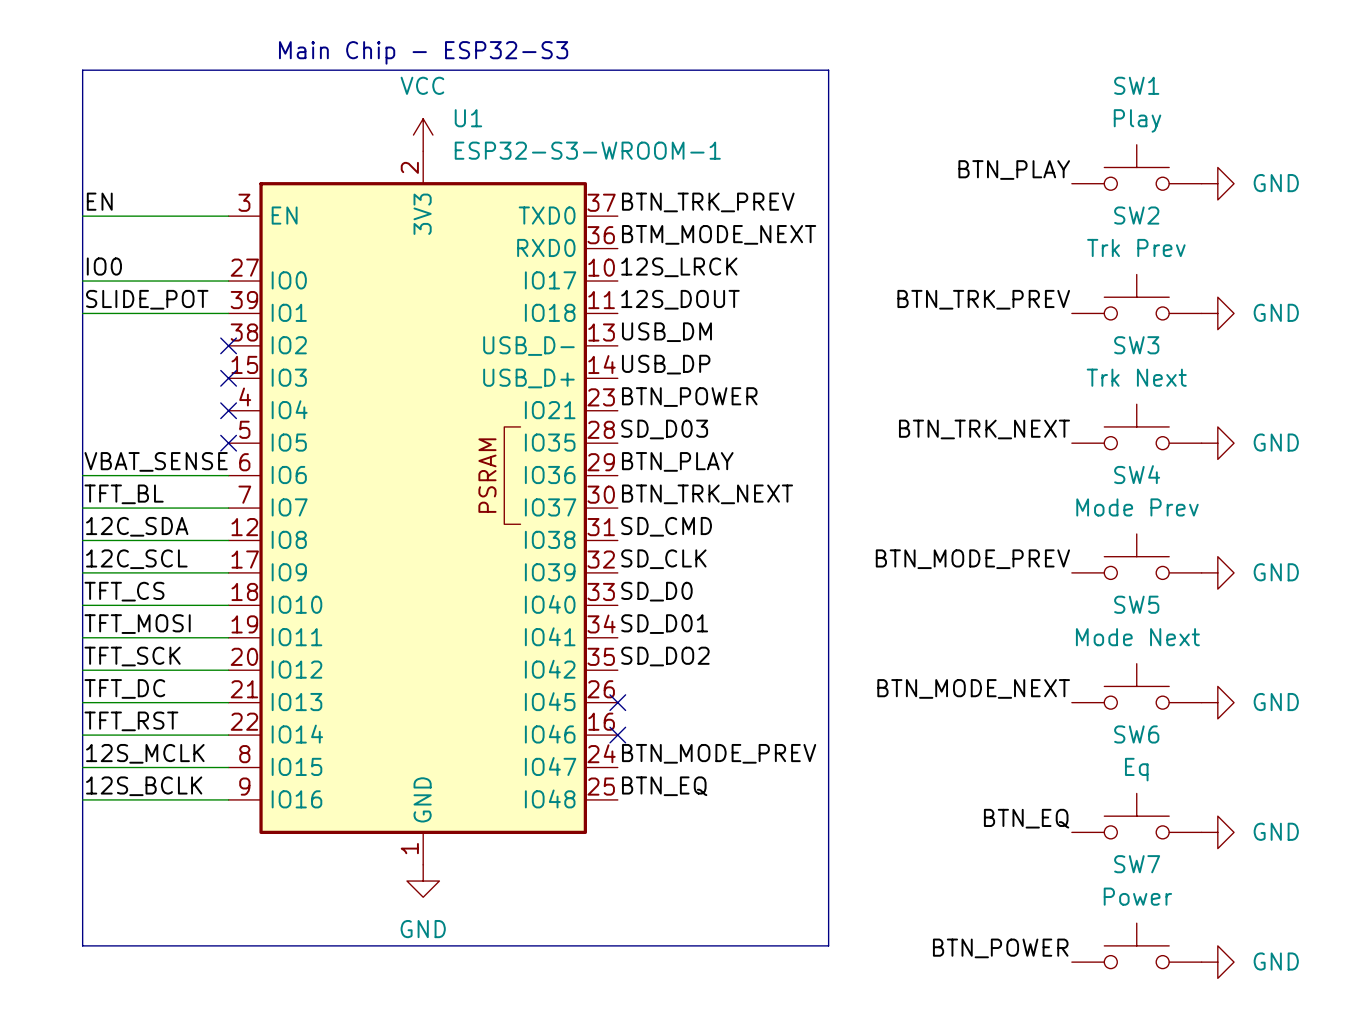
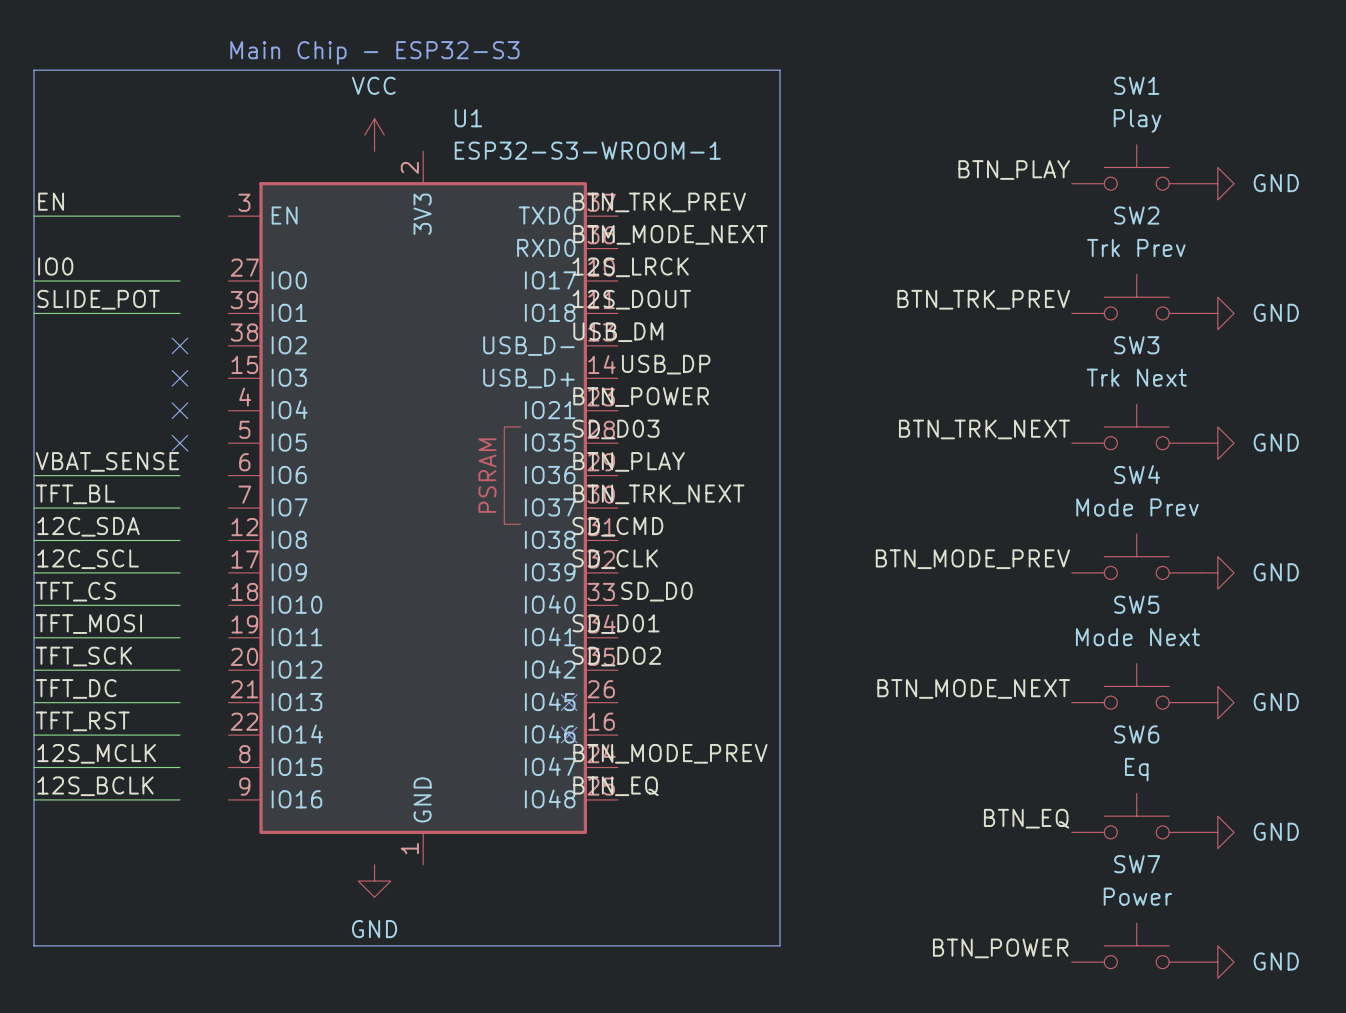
text position: Main Chip - ESP32-S3 (423, 52) -> Main Chip - ESP32-S3 (374, 52)
line: (82, 70) (82, 945) -> (82, 70) (33, 70) (33, 945) (82, 945)
line: (779, 70) (828, 70) (828, 945) (779, 945) -> (779, 70) (779, 945)
power symbol position: VCC (423, 135) -> VCC (374, 135)
label position: EN (99, 201) -> EN (51, 201)
label position: BTN_TRK_PREV (708, 202) -> BTN_TRK_PREV (659, 202)
wire: (179, 216) (228, 216) -> (33, 216) (82, 216)
label position: BTM_MODE_NEXT (719, 234) -> BTM_MODE_NEXT (670, 234)
label position: IO0 (104, 266) -> IO0 (55, 266)
label position: 12S_LRCK (679, 267) -> 12S_LRCK (630, 267)
wire: (179, 281) (228, 281) -> (33, 281) (82, 281)
label position: SLIDE_POT (147, 299) -> SLIDE_POT (98, 299)
label position: 12S_DOUT (680, 299) -> 12S_DOUT (631, 299)
wire: (179, 313) (228, 313) -> (33, 313) (82, 313)
label position: USB_DM (666, 332) -> USB_DM (618, 332)
no-connect mark: none -> (179, 345)
no-connect mark: (228, 345) -> none
no-connect mark: none -> (179, 378)
no-connect mark: (228, 378) -> none
label position: BTN_POWER (689, 397) -> BTN_POWER (641, 397)
no-connect mark: none -> (179, 410)
no-connect mark: (228, 410) -> none
label position: SD_D03 (664, 429) -> SD_D03 (615, 429)
no-connect mark: none -> (179, 443)
no-connect mark: (228, 443) -> none
label position: VBAT_SENSE (156, 461) -> VBAT_SENSE (107, 461)
label position: BTN_PLAY (677, 461) -> BTN_PLAY (629, 461)
wire: (179, 475) (228, 475) -> (33, 475) (82, 475)
label position: TFT_BL (124, 494) -> TFT_BL (75, 494)
label position: BTN_TRK_NEXT (707, 494) -> BTN_TRK_NEXT (658, 494)
wire: (179, 508) (228, 508) -> (33, 508) (82, 508)
label position: 12C_SDA (137, 526) -> 12C_SDA (88, 526)
label position: SD_CMD (666, 526) -> SD_CMD (617, 526)
wire: (179, 540) (228, 540) -> (33, 540) (82, 540)
label position: 12C_SCL (136, 559) -> 12C_SCL (88, 559)
label position: SD_CLK (663, 559) -> SD_CLK (615, 559)
wire: (179, 572) (228, 572) -> (33, 572) (82, 572)
label position: TFT_CS (124, 591) -> TFT_CS (75, 591)
wire: (179, 605) (228, 605) -> (33, 605) (82, 605)
label position: TFT_MOSI (137, 624) -> TFT_MOSI (88, 624)
label position: SD_D01 (664, 624) -> SD_D01 (615, 624)
wire: (179, 637) (228, 637) -> (33, 637) (82, 637)
label position: TFT_SCK (132, 656) -> TFT_SCK (83, 656)
label position: SD_DO2 (665, 656) -> SD_DO2 (616, 656)
wire: (179, 670) (228, 670) -> (33, 670) (82, 670)
label position: TFT_DC (124, 688) -> TFT_DC (76, 688)
wire: (179, 702) (228, 702) -> (33, 702) (82, 702)
no-connect mark: none -> (569, 702)
no-connect mark: (617, 702) -> none
label position: TFT_RST (131, 721) -> TFT_RST (82, 721)
wire: (179, 735) (228, 735) -> (33, 735) (82, 735)
no-connect mark: none -> (569, 735)
no-connect mark: (617, 735) -> none
label position: 12S_MCLK (145, 753) -> 12S_MCLK (96, 753)
label position: BTN_MODE_PREV (719, 753) -> BTN_MODE_PREV (670, 753)
wire: (179, 767) (228, 767) -> (33, 767) (82, 767)
label position: 12S_BCLK (144, 786) -> 12S_BCLK (95, 786)
label position: BTN_EQ (664, 786) -> BTN_EQ (615, 786)
wire: (179, 799) (228, 799) -> (33, 799) (82, 799)
power symbol position: GND (423, 881) -> GND (374, 881)

